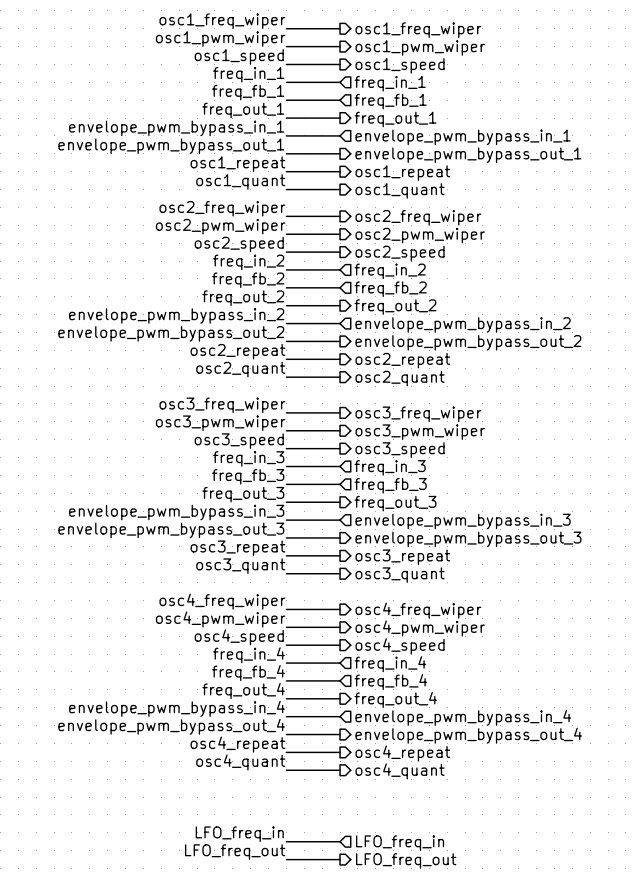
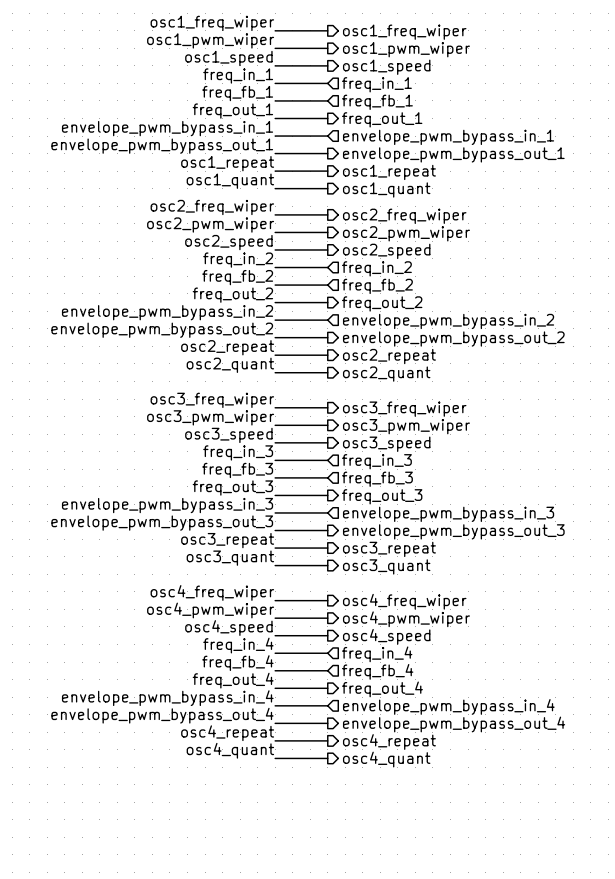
label: LFO_freq_in (239, 834) -> none
wire: (286, 841) (340, 841) -> none
hierarchical label: LFO_freq_in (400, 843) -> none
label: LFO_freq_out (235, 852) -> none
wire: (286, 859) (340, 859) -> none
hierarchical label: LFO_freq_out (406, 860) -> none

